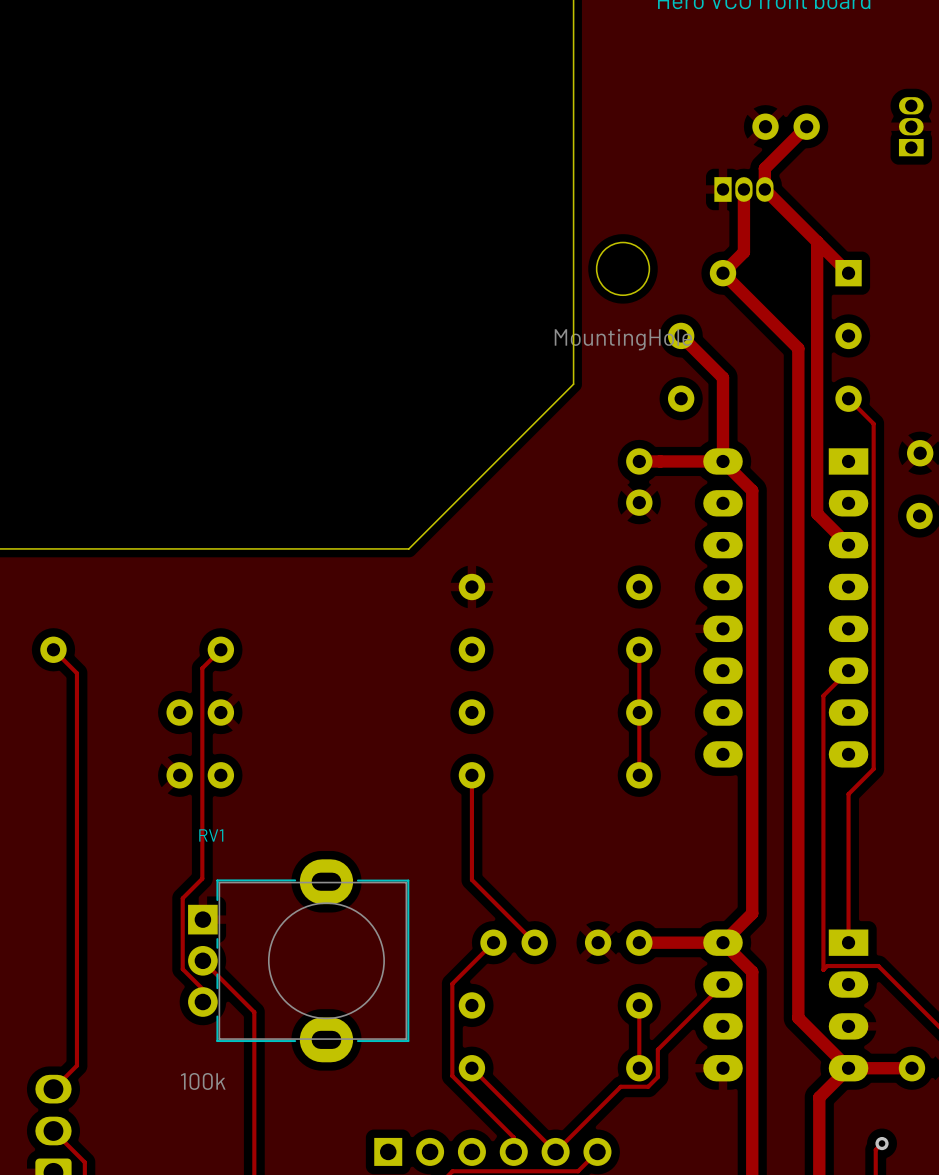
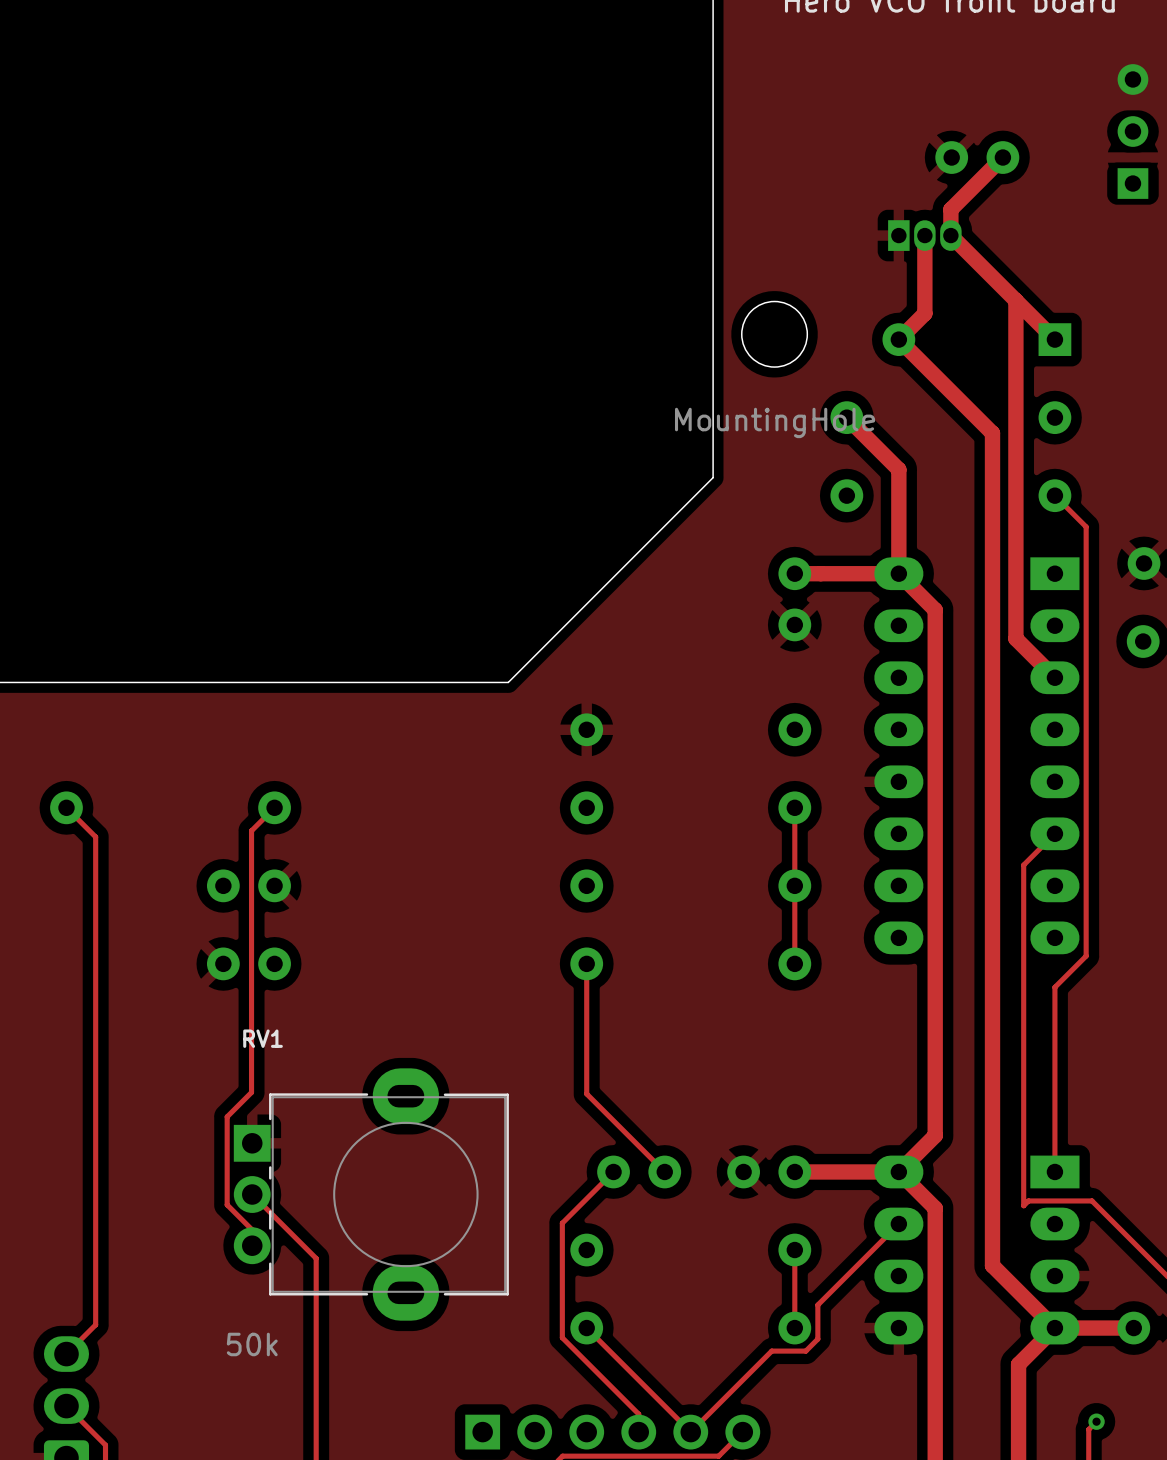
part: none -> (1132, 131)
part: (911, 126) -> none
RV1 value: 100k (203, 1081) -> 50k (252, 1344)

